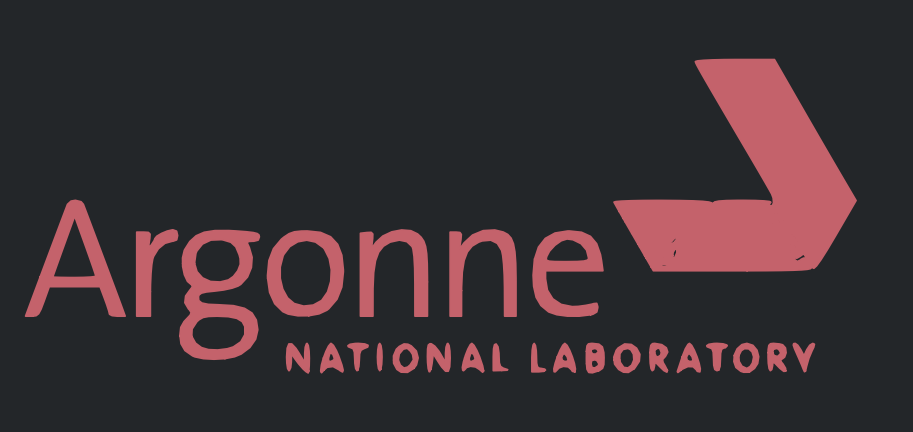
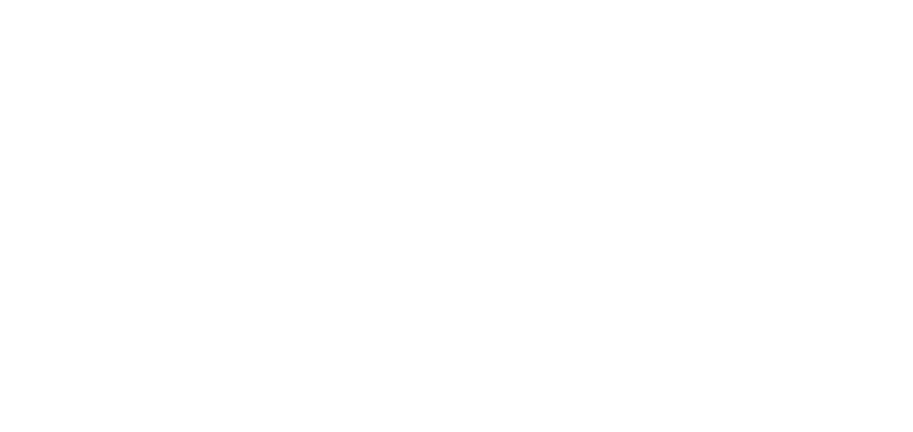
part: (440, 216) -> none

